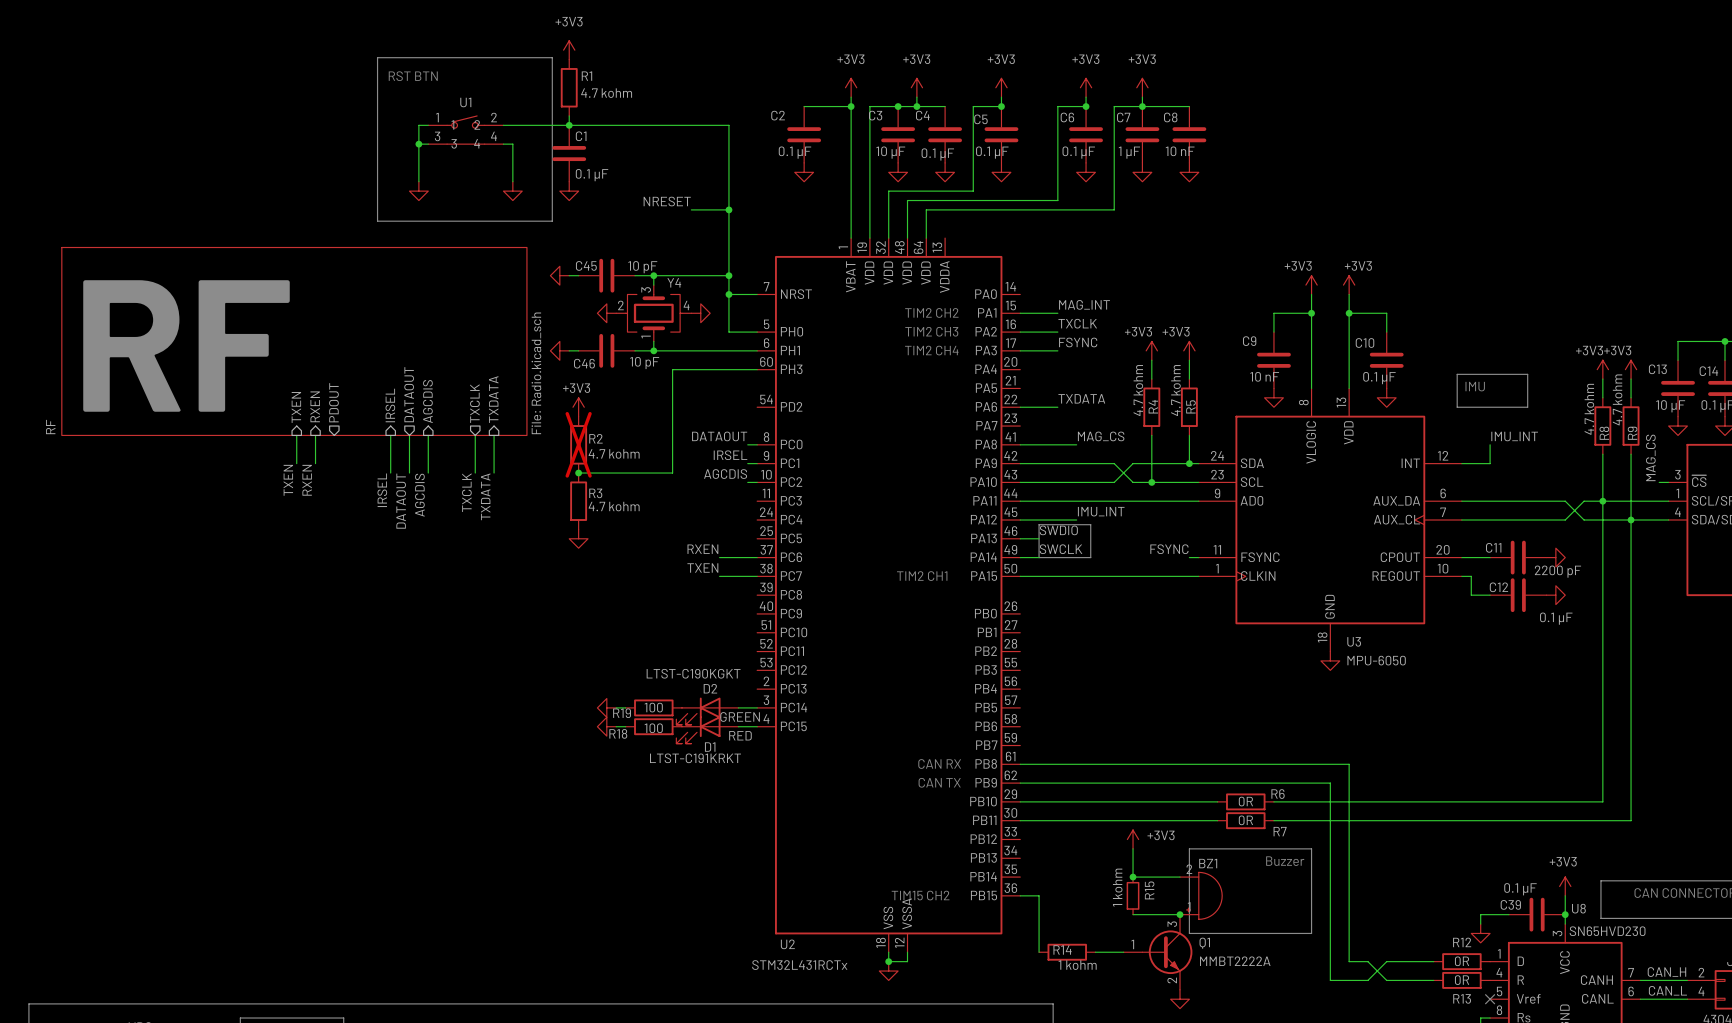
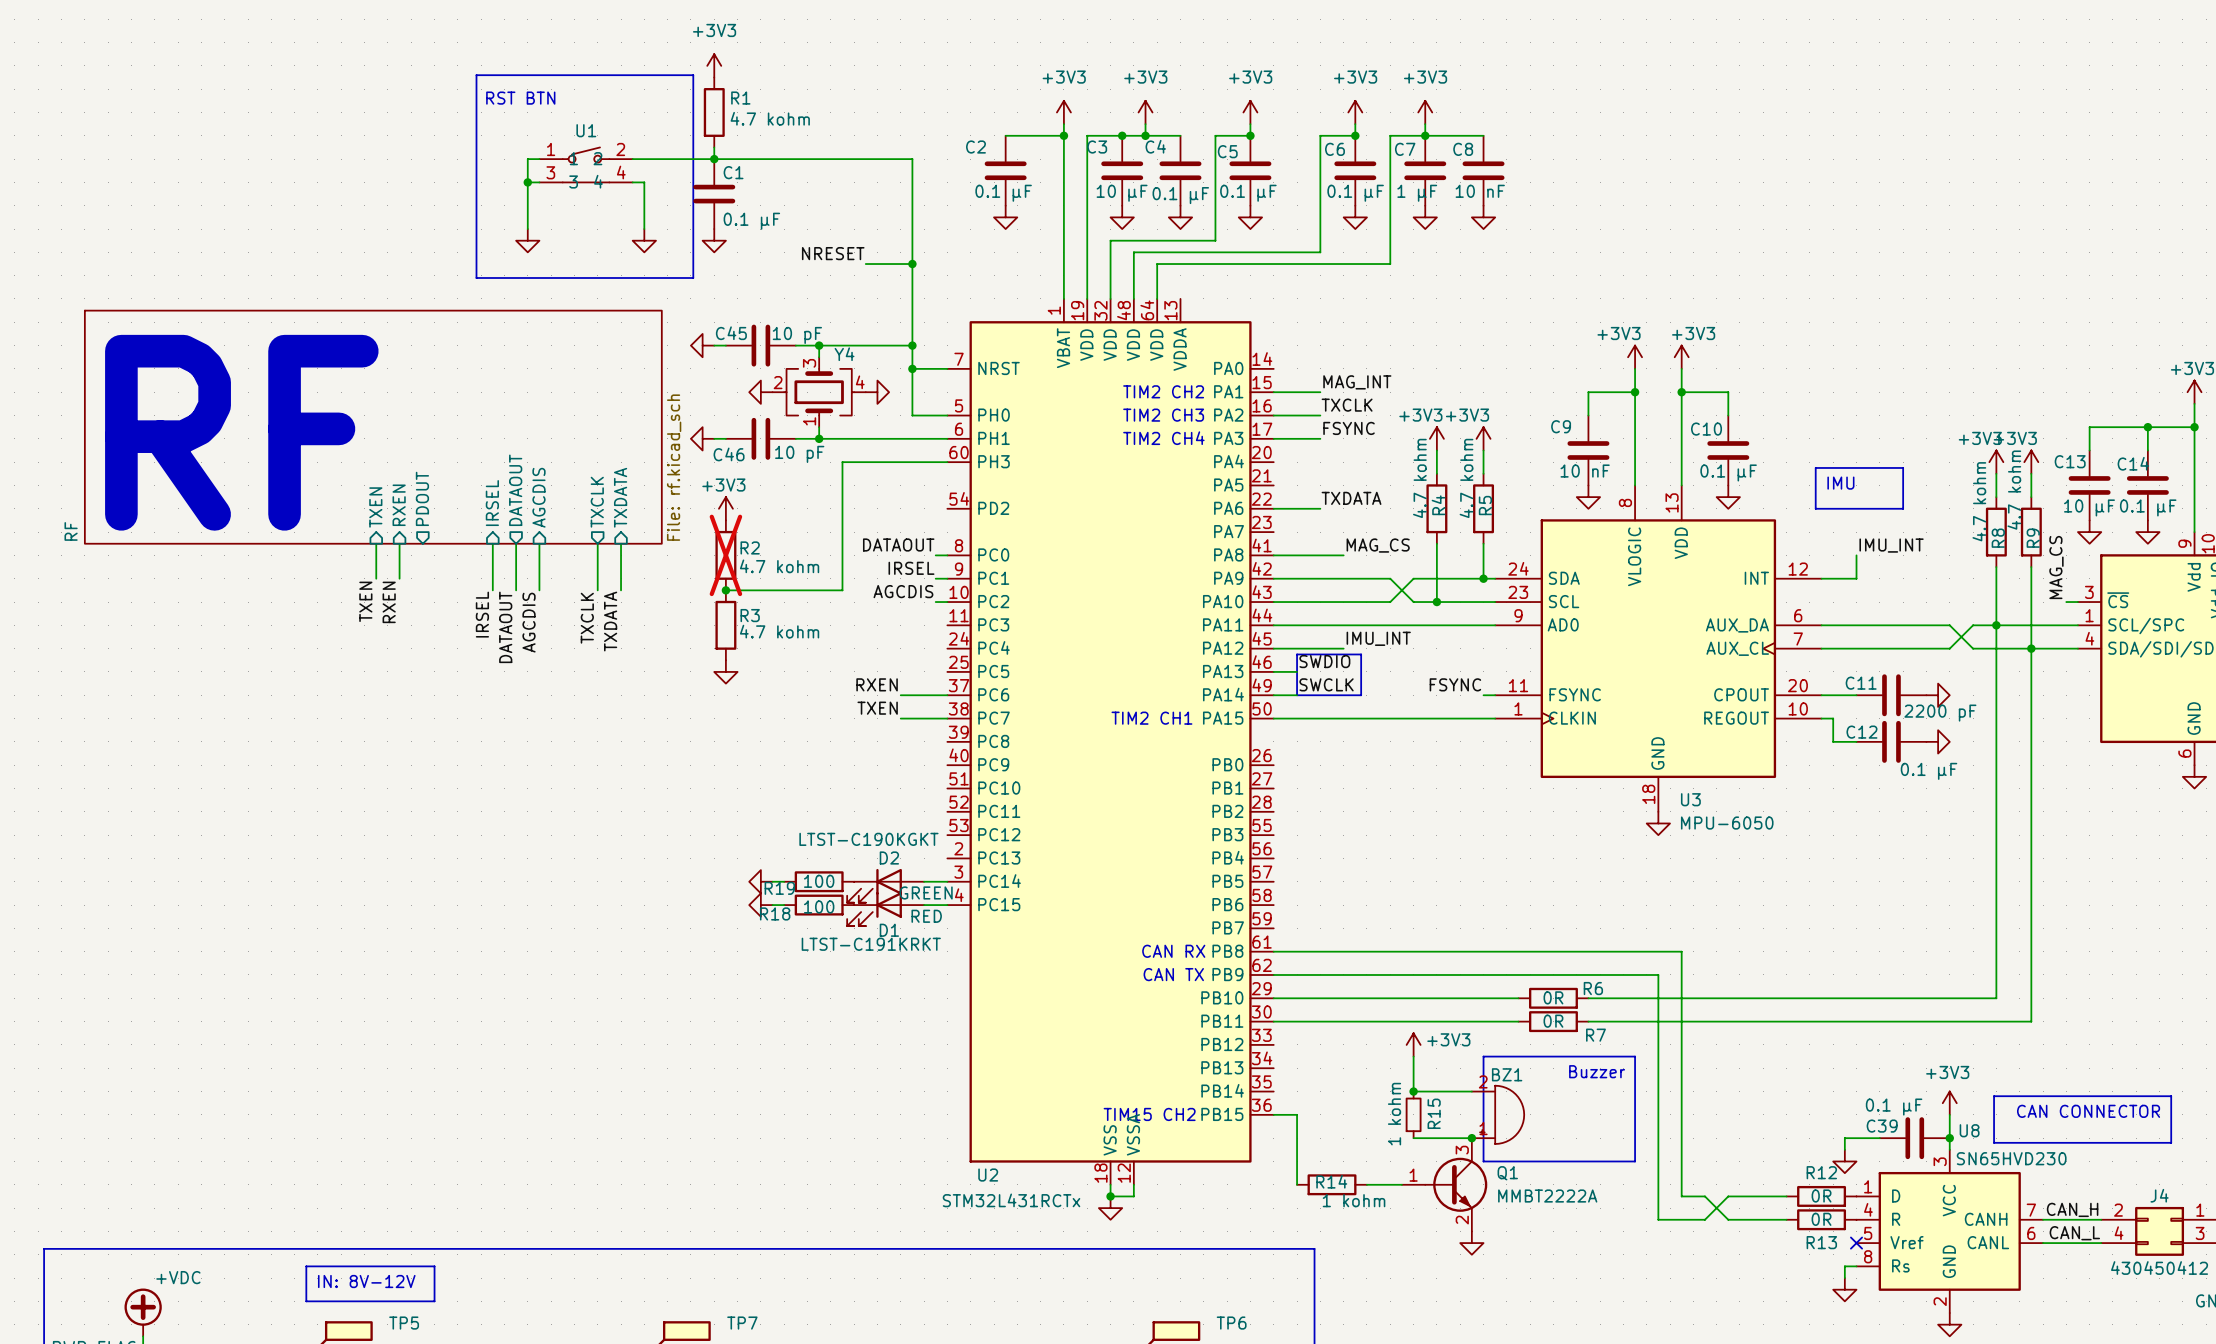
sheet RF value: File: Radio.kicad_sch (536, 373) -> File: rf.kicad_sch (674, 467)

